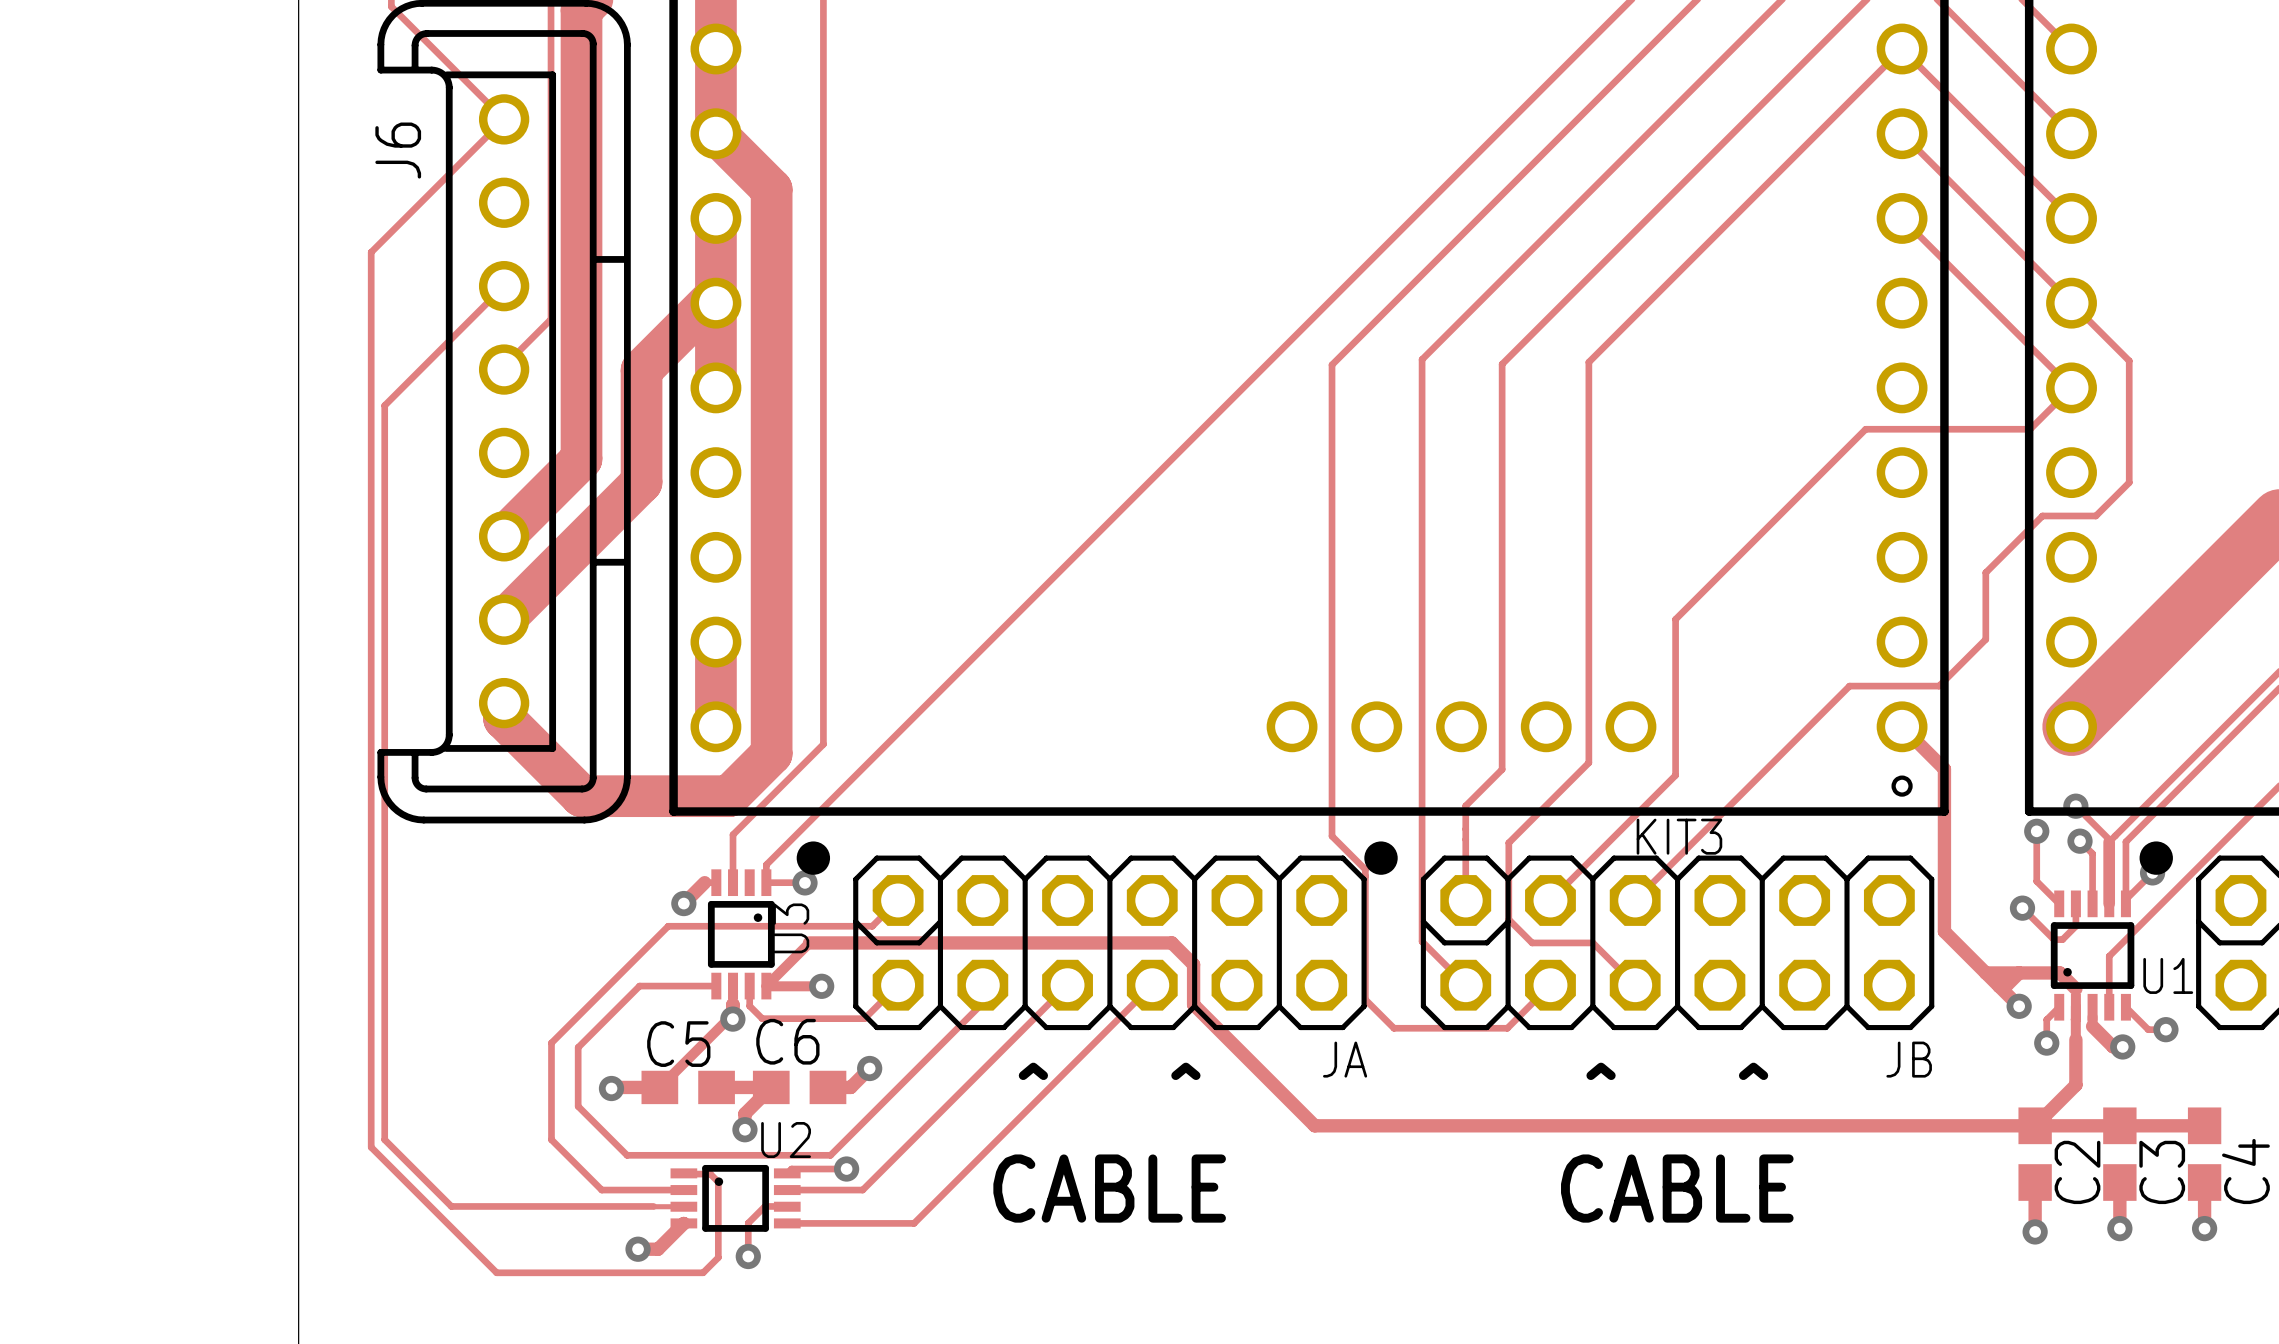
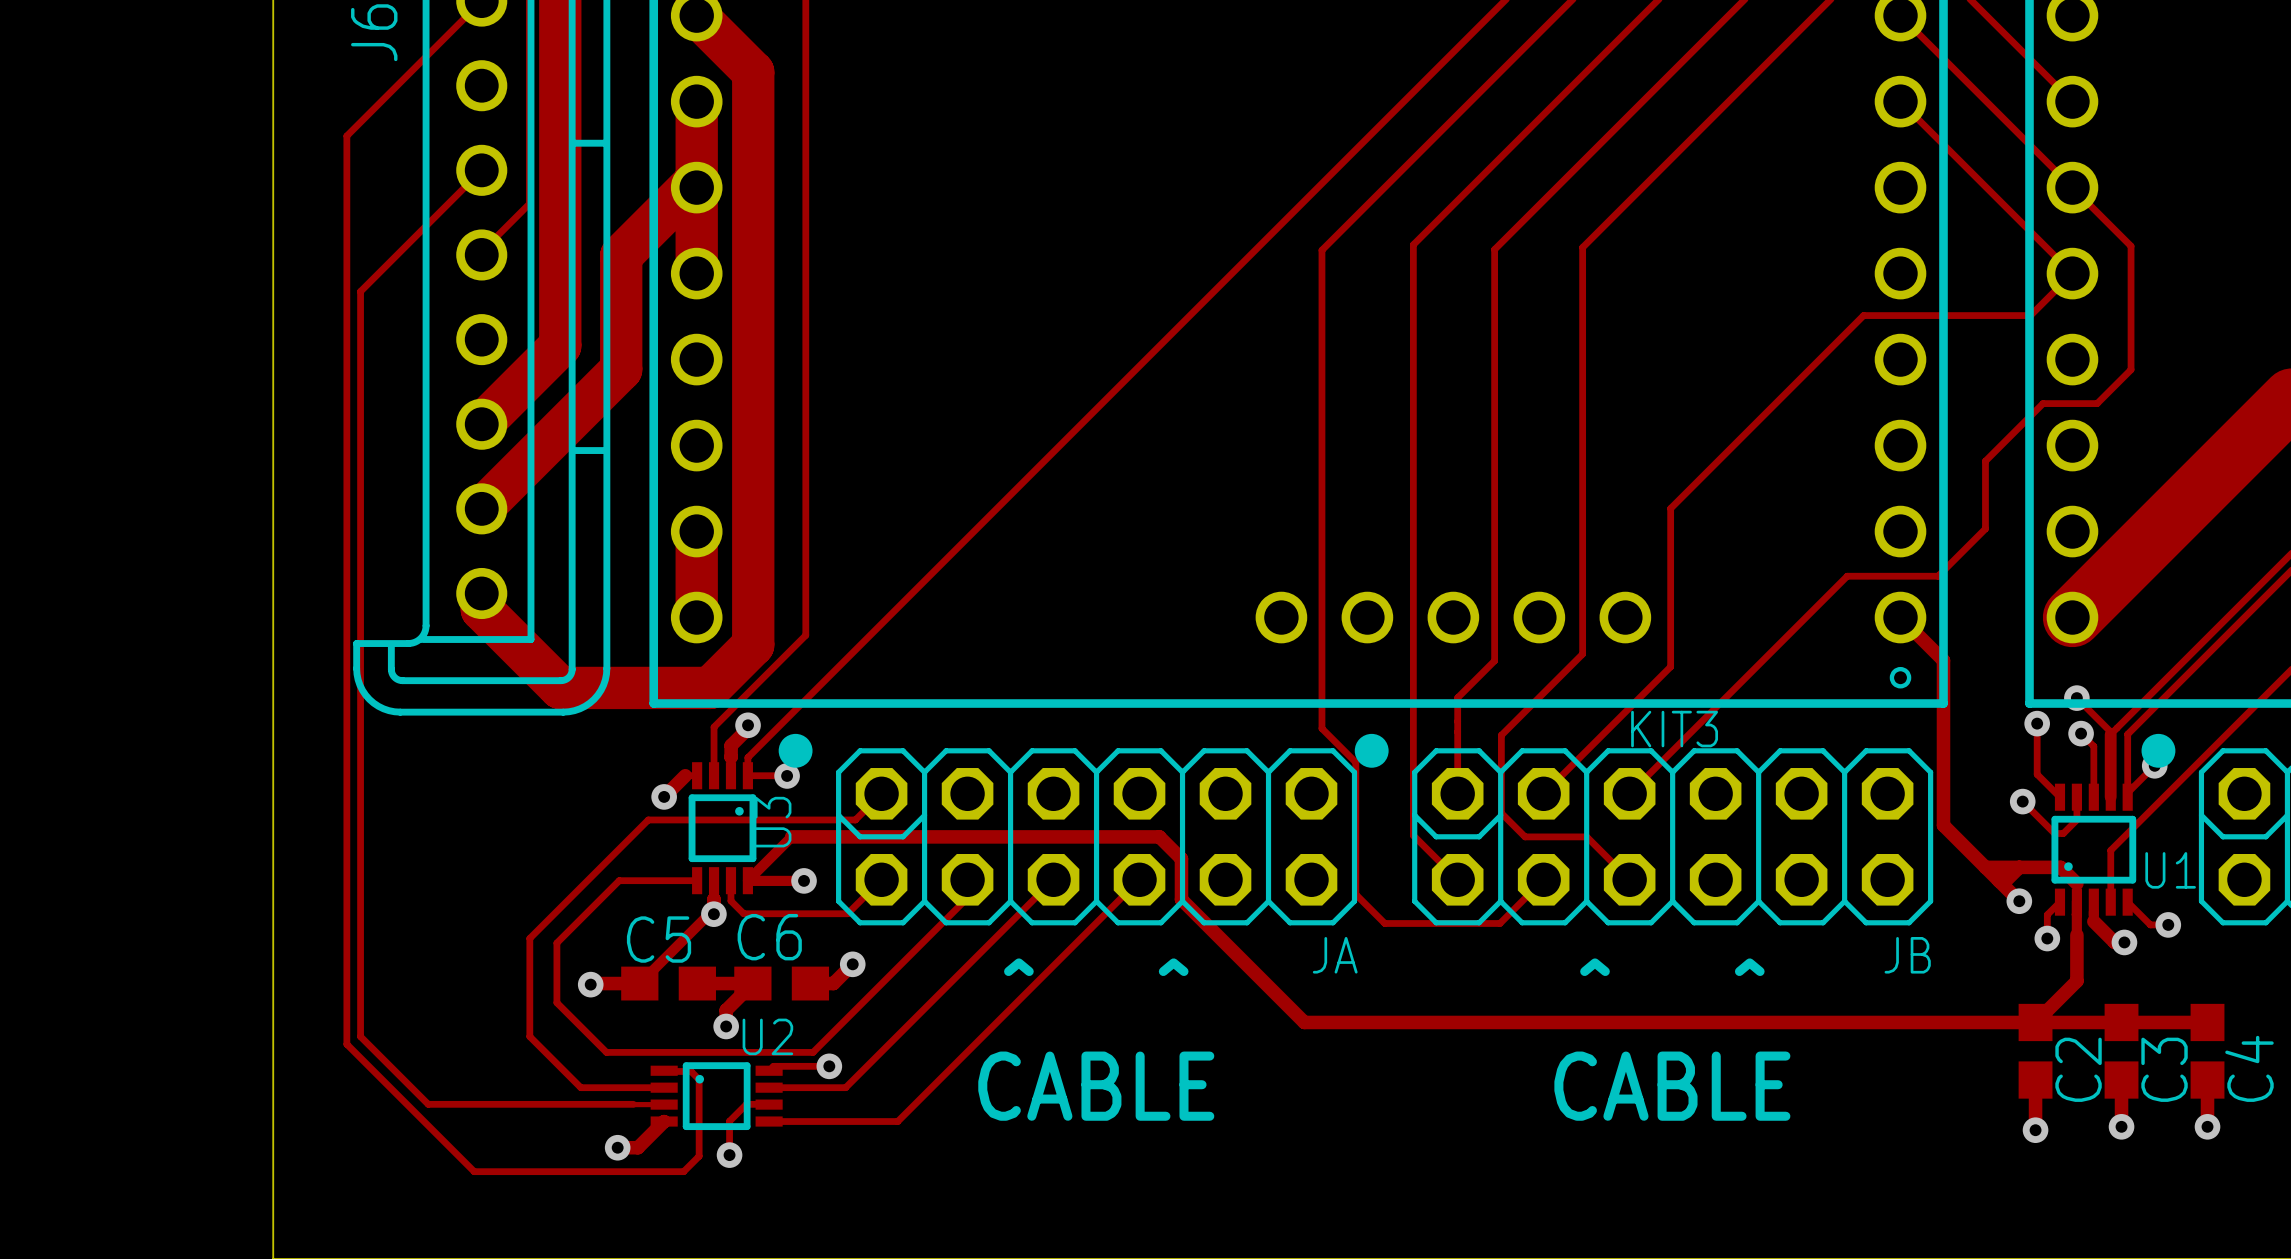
track: none -> (748, 725) (748, 728) (731, 745) (731, 757)
via: none -> (748, 725)

